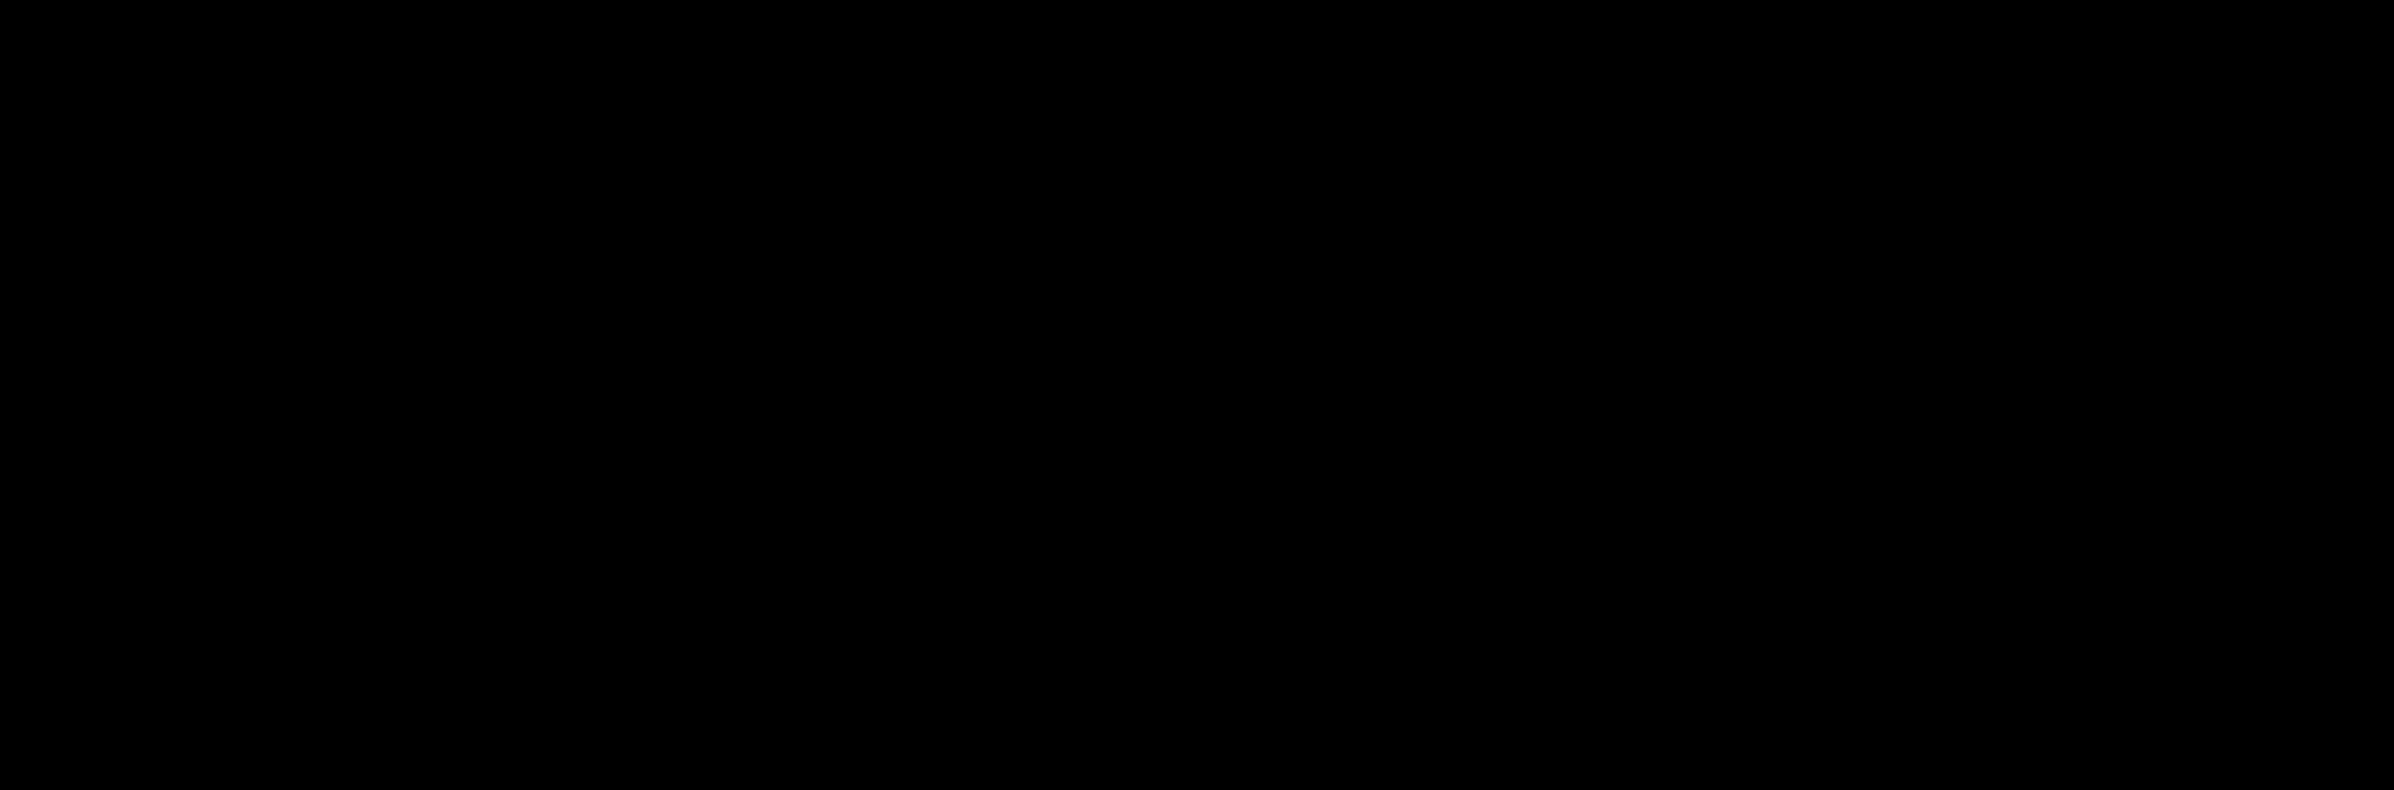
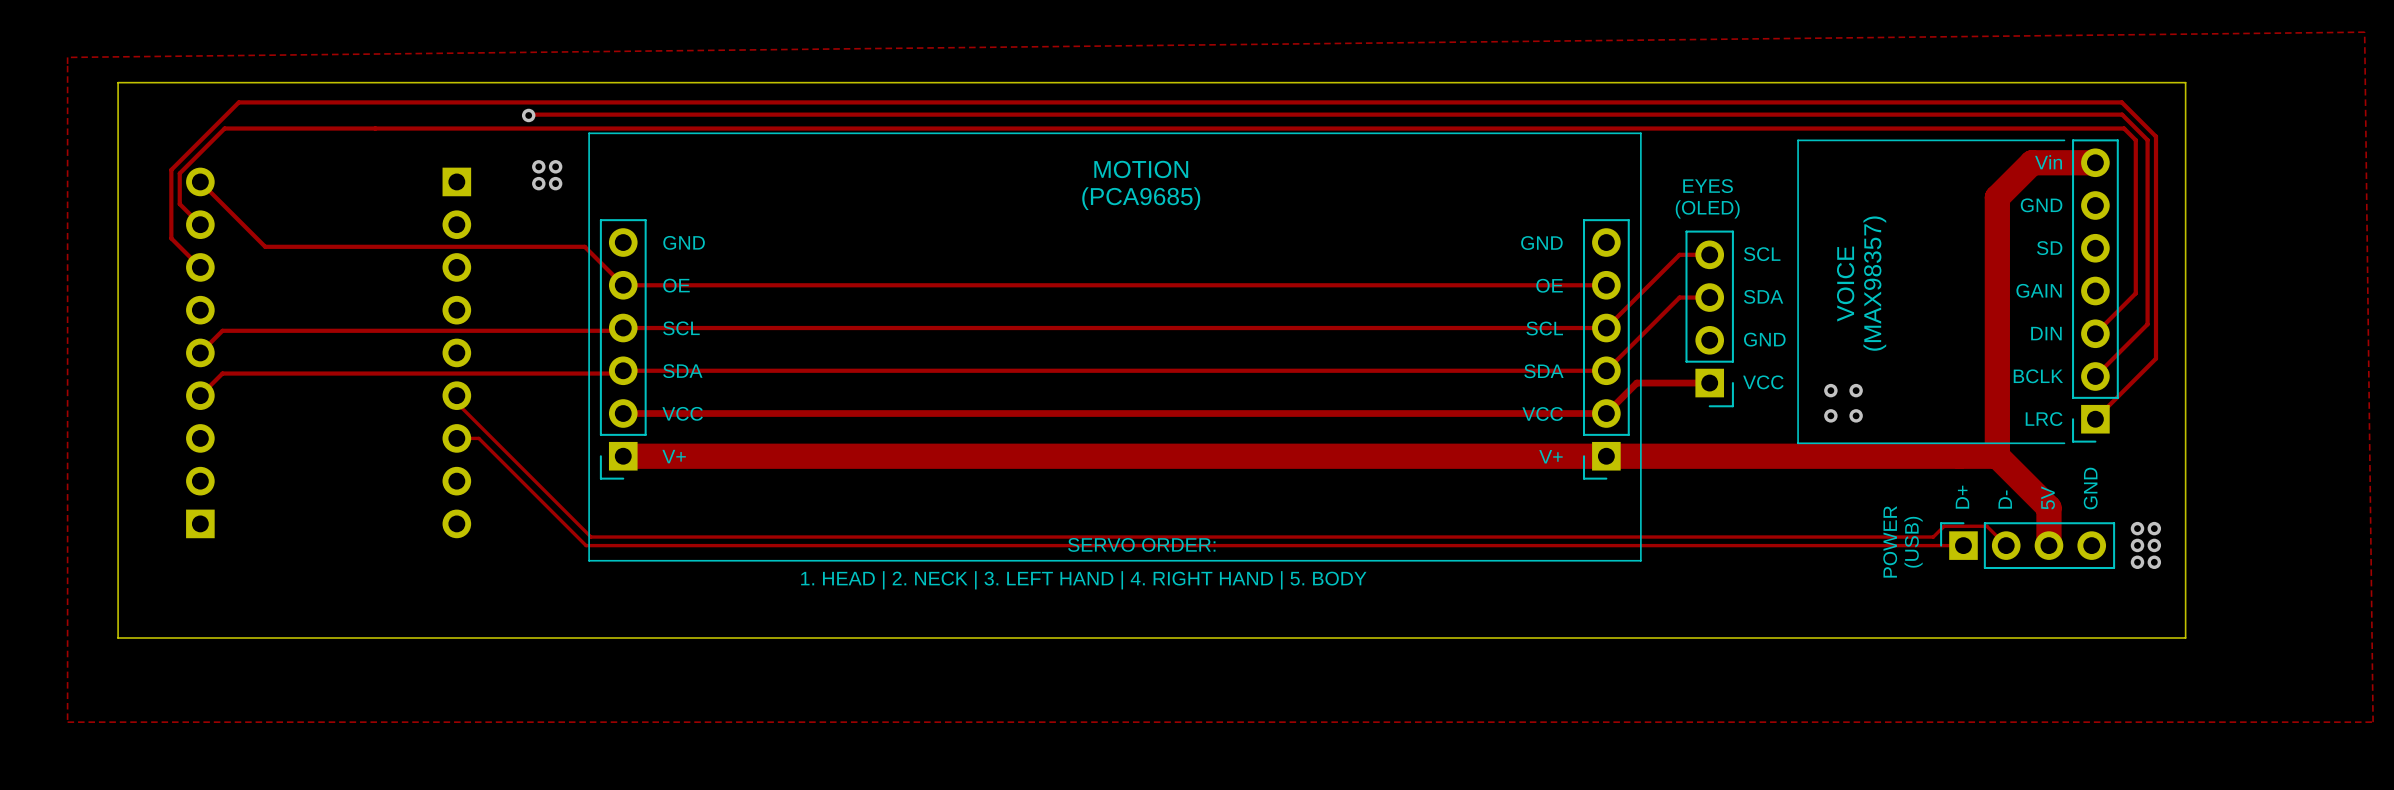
zone outline: none -> (2364, 32) (2373, 722) (67, 722) (67, 57) (2364, 32)
board edge: none -> (118, 82) (2185, 82) (2185, 638) (118, 638) (118, 82)
track: none -> (528, 115) (2122, 114) (2147, 140) (2147, 324) (2095, 376)
via: none -> (528, 115)
line: none -> (589, 133) (1640, 133) (1640, 560) (589, 560) (589, 133)
line: none -> (2064, 140) (1798, 140) (1798, 443) (2064, 443)
text: none -> Vin (2048, 162)
track: none -> (2095, 162) (2032, 162) (1997, 197) (1997, 456)
via: none -> (538, 166)
via: none -> (555, 166)
text: none -> MOTION (1141, 169)
track: none -> (200, 181) (265, 246) (584, 246) (623, 285) (1606, 285)
via: none -> (538, 183)
via: none -> (555, 183)
text: none -> EYES (1708, 186)
text: none -> (PCA9685) (1141, 198)
text: none -> GND (2041, 205)
text: none -> (OLED) (1707, 209)
track: none -> (200, 224) (179, 204) (179, 173) (224, 128) (2124, 128) (2135, 140) (2135, 293) (2095, 333)
text: none -> GND (684, 242)
text: none -> GND (1541, 243)
text: none -> SD (2049, 248)
track: none -> (1709, 254) (1679, 254) (1606, 328) (623, 328) (620, 330) (222, 330) (200, 352)
text: none -> SCL (1762, 254)
track: none -> (200, 267) (171, 238) (171, 169) (238, 102) (2121, 102) (2156, 136) (2156, 358) (2095, 419)
text: none -> VOICE (1845, 284)
text: none -> (MAX98357) (1874, 283)
text: none -> OE (676, 285)
text: none -> OE (1549, 285)
text: none -> GAIN (2039, 290)
part: none -> (2095, 290)
text: none -> SDA (1763, 296)
track: none -> (1709, 297) (1679, 297) (1606, 370) (623, 370) (620, 373) (222, 373) (200, 395)
part: none -> (1709, 318)
text: none -> SCL (681, 328)
text: none -> SCL (1544, 328)
text: none -> DIN (2046, 333)
text: none -> GND (1764, 339)
part: none -> (623, 349)
part: none -> (1606, 349)
part: none -> (200, 352)
part: none -> (456, 352)
text: none -> SDA (682, 371)
text: none -> SDA (1543, 371)
text: none -> BCLK (2038, 376)
text: none -> VCC (1763, 382)
track: none -> (1709, 383) (1636, 383) (1606, 413)
via: none -> (1830, 390)
via: none -> (1856, 390)
track: none -> (456, 395) (456, 402) (590, 537) (1933, 537) (1944, 526) (1986, 526) (2006, 545)
track: none -> (623, 413) (1609, 413)
text: none -> VCC (682, 413)
text: none -> VCC (1542, 414)
via: none -> (1830, 415)
via: none -> (1856, 415)
text: none -> LRC (2044, 419)
track: none -> (456, 438) (478, 438) (586, 545) (1963, 545)
track: none -> (623, 456) (1997, 456)
text: none -> V+ (674, 456)
text: none -> V+ (1550, 456)
track: none -> (1997, 456) (2048, 507) (2048, 545)
text: none -> GND (2090, 488)
text: none -> D+ (1962, 497)
text: none -> 5V (2048, 497)
text: none -> D- (2005, 499)
via: none -> (2137, 528)
via: none -> (2154, 528)
text: none -> POWER (1890, 541)
text: none -> (USB) (1913, 542)
text: none -> SERVO ORDER: (1141, 544)
part: none -> (2027, 545)
via: none -> (2137, 545)
via: none -> (2154, 545)
via: none -> (2137, 562)
via: none -> (2154, 562)
text: none -> 1. HEAD | 2. NECK | 3. LEFT HAND | 4. RIGHT HAND | 5. BODY (1083, 580)

